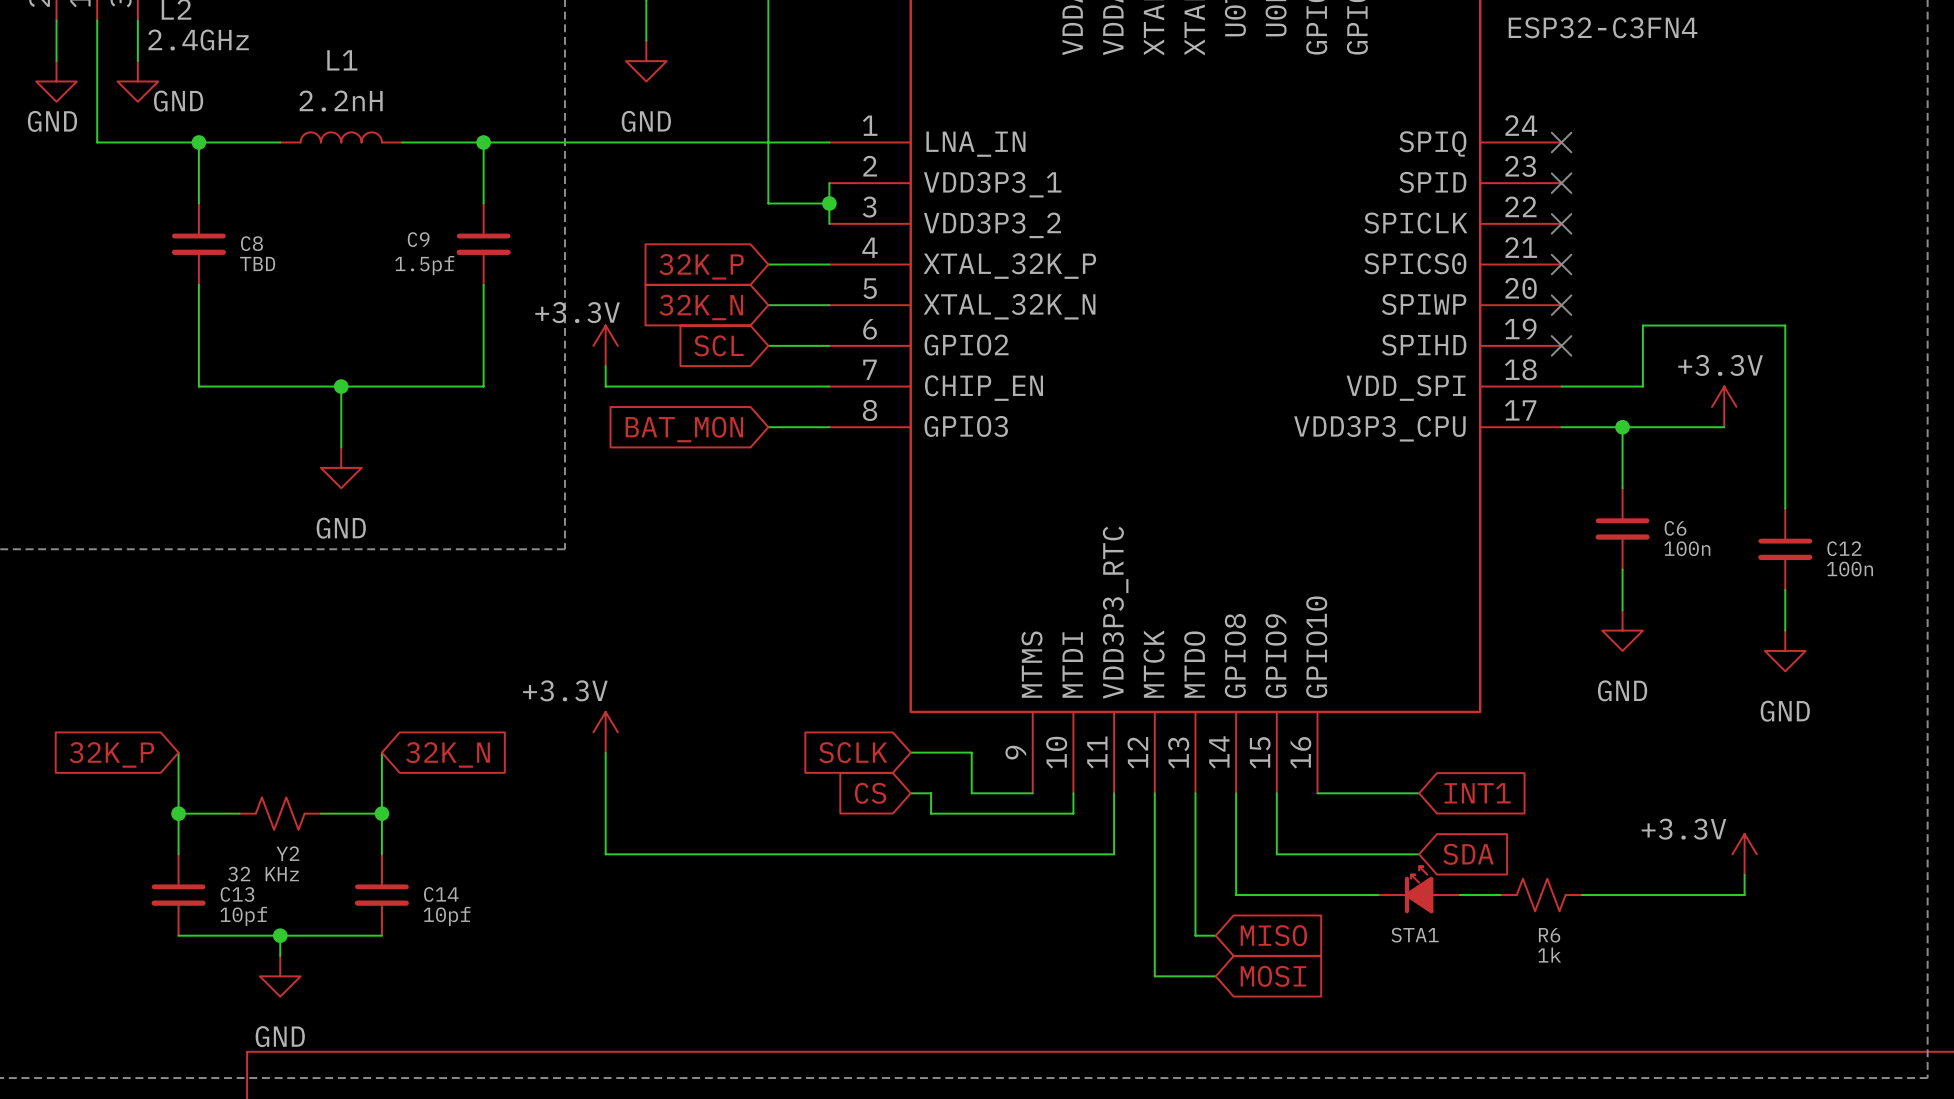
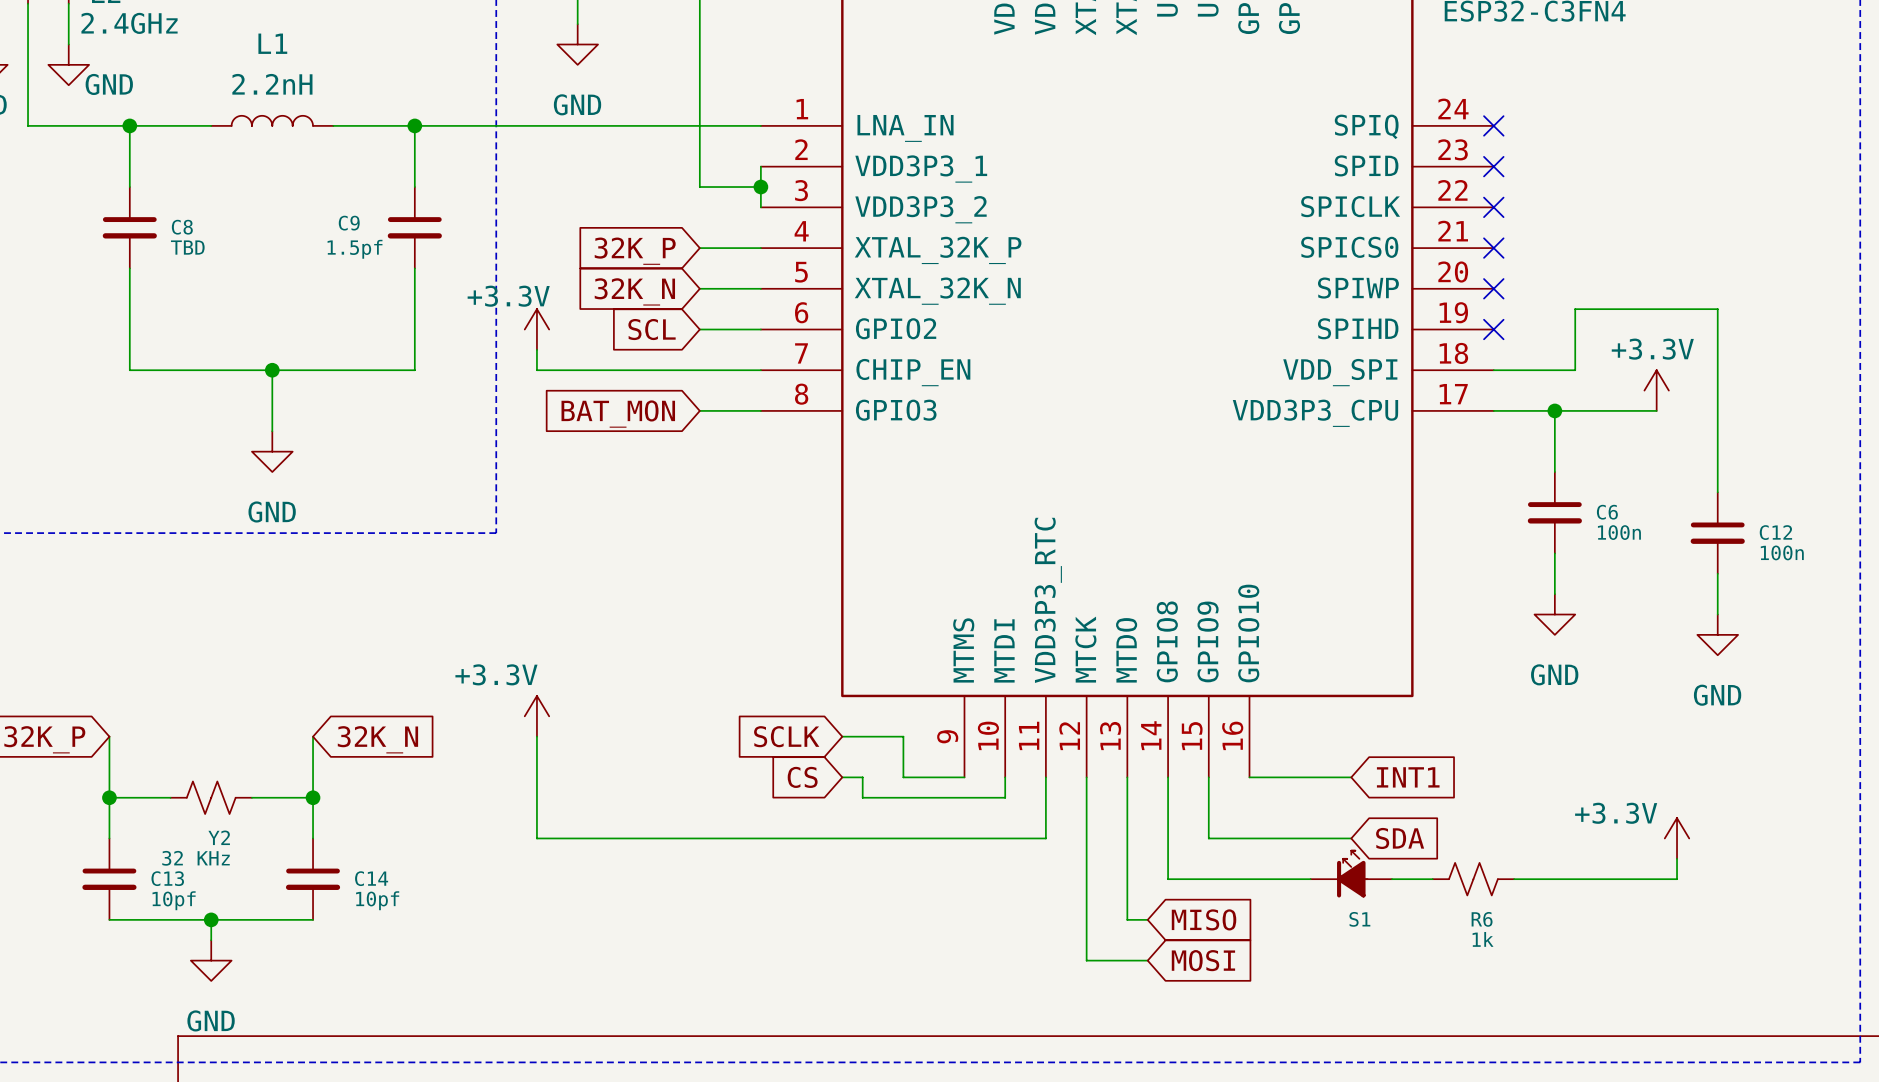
STA1 name: STA1 (1415, 935) -> S1 (1359, 919)

